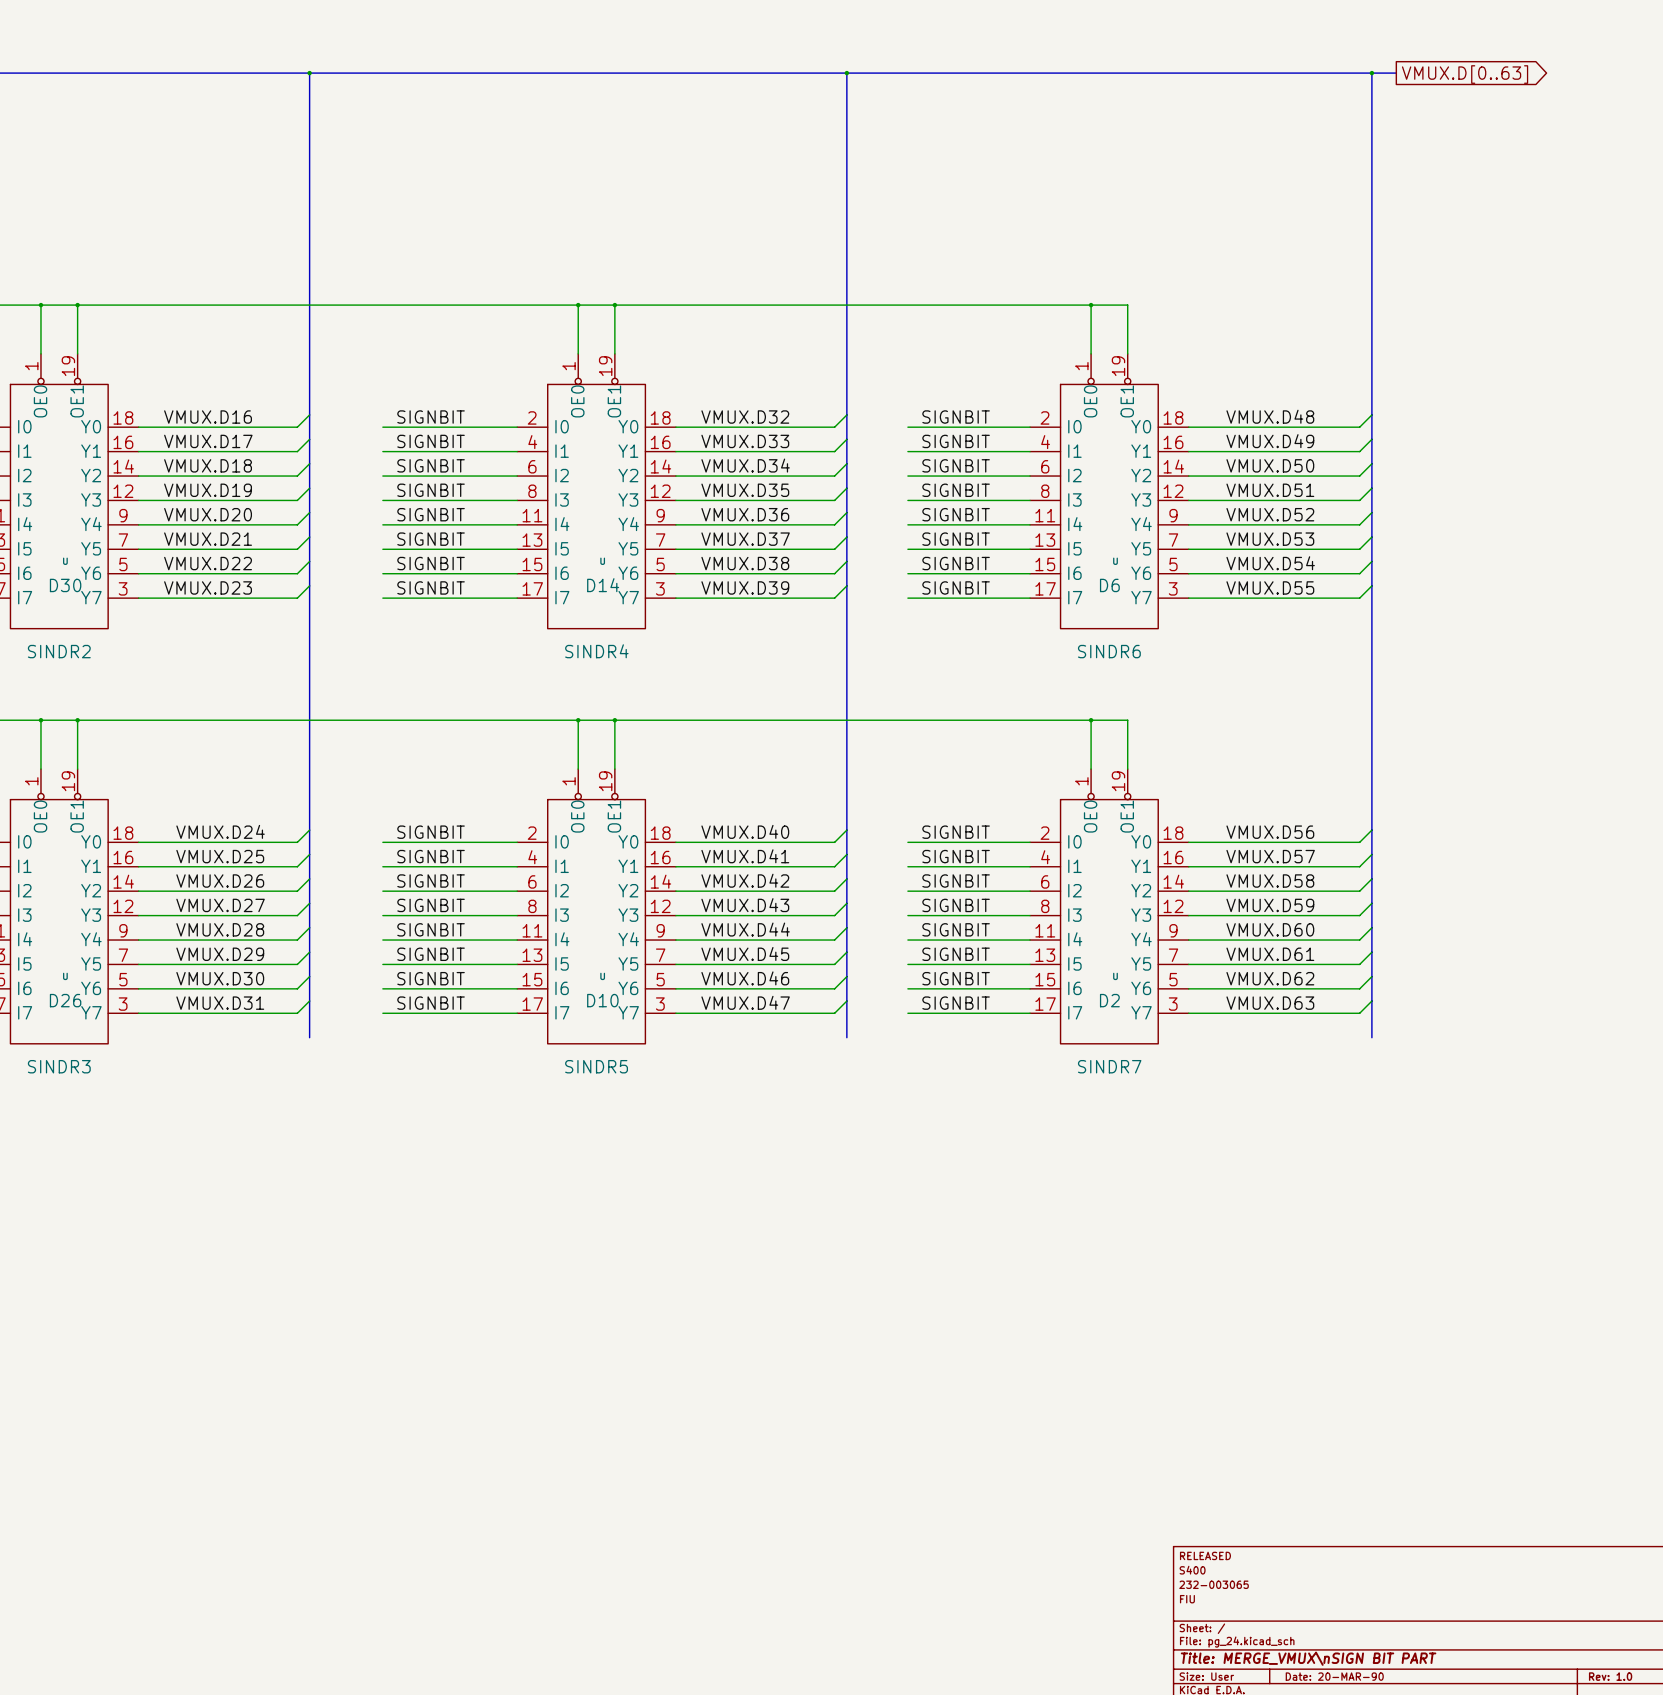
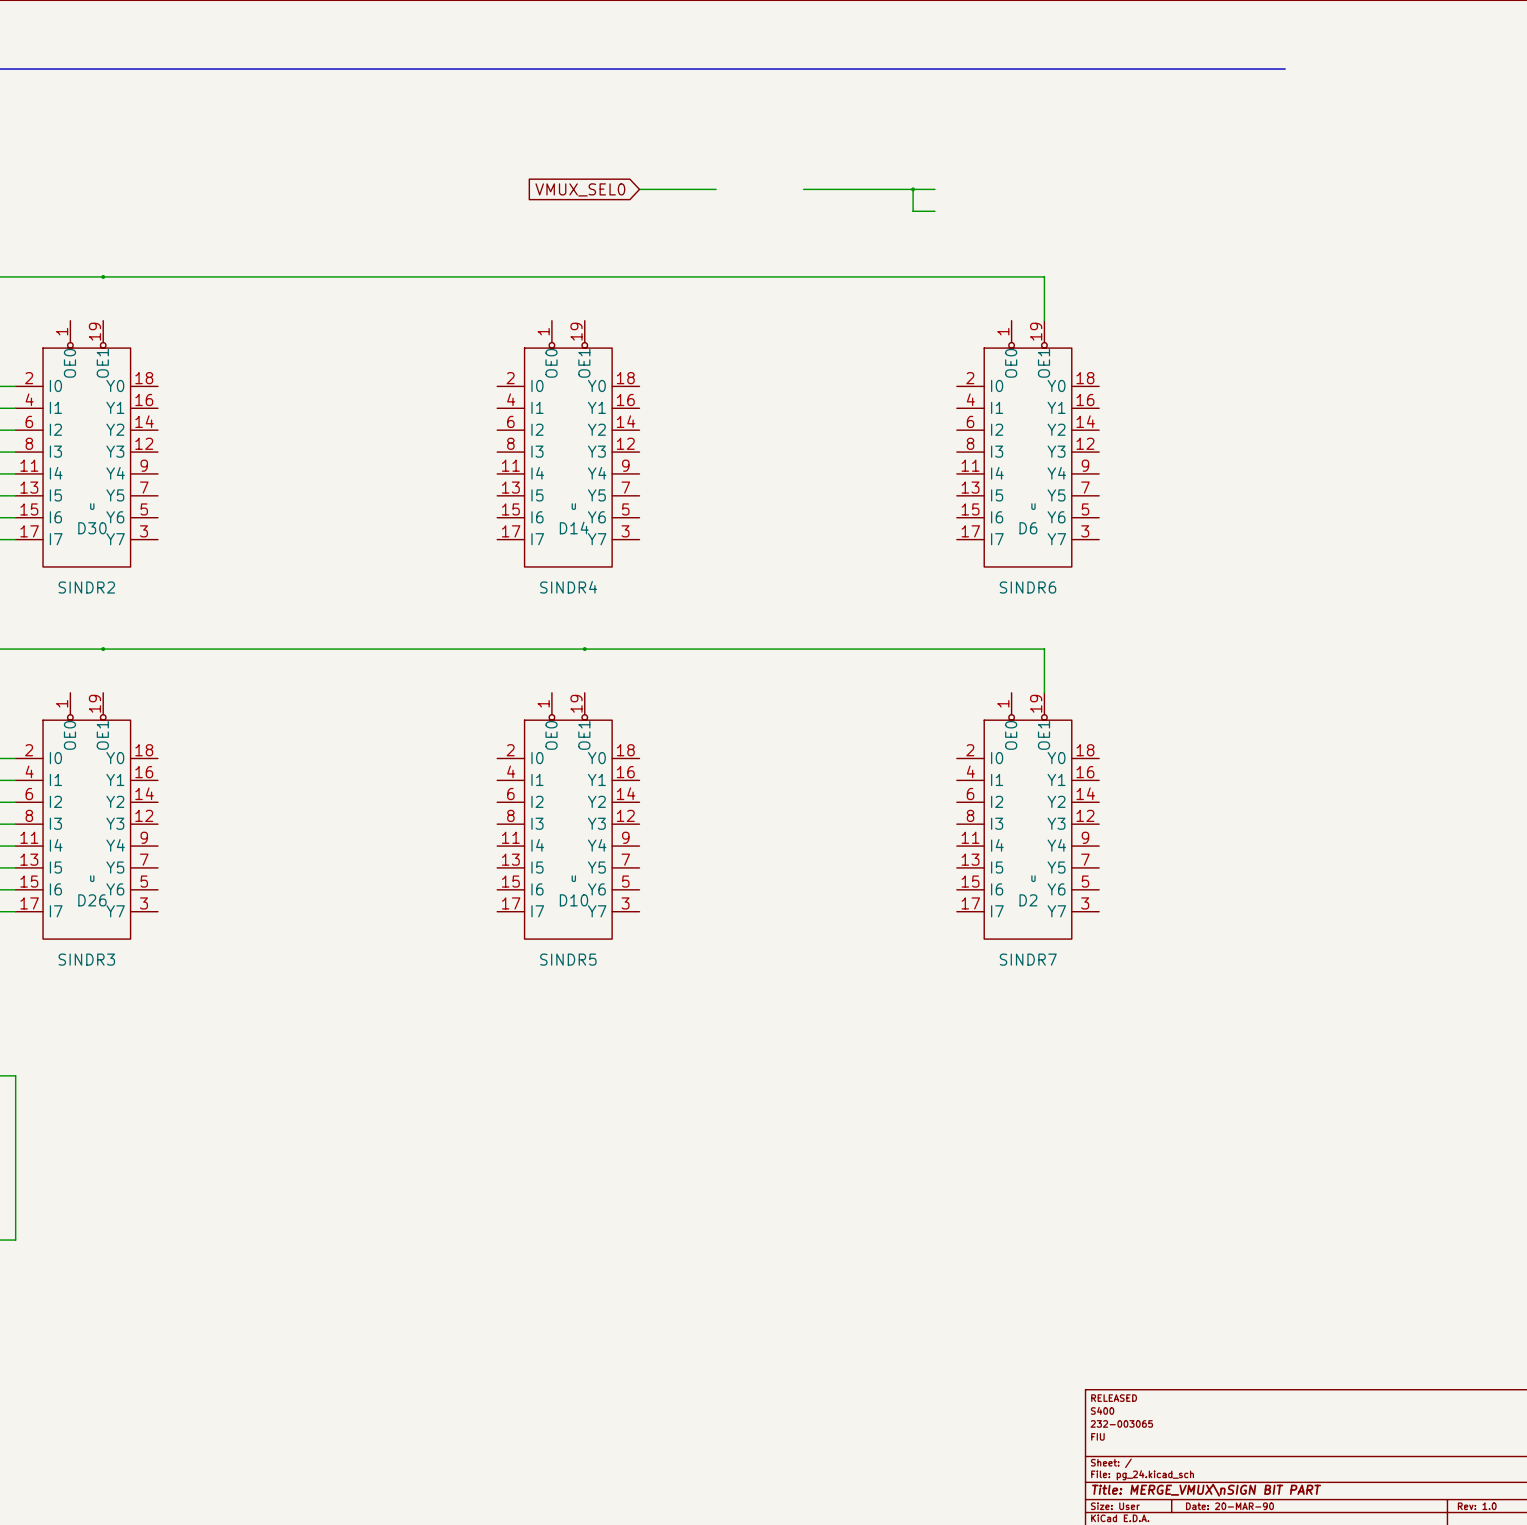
bus: (309, 73) (309, 1037) -> none
junction: (309, 73) -> none
bus: (846, 73) (846, 1037) -> none
junction: (846, 73) -> none
bus: (1371, 73) (1371, 1037) -> none
junction: (1371, 73) -> none
global label: VMUX.D[0..63] (1465, 74) -> none
global label: none -> VMUX_SEL0 (580, 189)
wire: none -> (639, 189) (716, 189)
wire: none -> (803, 189) (934, 189)
wire: none -> (913, 189) (913, 211) (934, 211)
junction: none -> (913, 189)
wire: (40, 305) (40, 353) -> none
junction: (40, 305) -> none
wire: (77, 305) (77, 353) -> none
wire: (578, 305) (578, 353) -> none
junction: (578, 305) -> none
wire: (614, 305) (614, 353) -> none
junction: (614, 305) -> none
wire: (1091, 305) (1091, 353) -> none
junction: (1091, 305) -> none
wire: (309, 414) (297, 427) (138, 427) -> none
wire: (846, 414) (834, 427) (675, 427) -> none
wire: (1371, 414) (1359, 427) (1188, 427) -> none
label: VMUX.D48 (1270, 416) -> none
label: VMUX.D16 (208, 417) -> none
label: SIGNBIT (431, 417) -> none
label: VMUX.D32 (745, 417) -> none
label: SIGNBIT (956, 417) -> none
wire: (382, 427) (517, 427) -> none
wire: (907, 427) (1030, 427) -> none
wire: (309, 439) (297, 451) (138, 451) -> none
wire: (846, 439) (834, 451) (675, 451) -> none
wire: (1371, 439) (1359, 451) (1188, 451) -> none
label: VMUX.D17 (208, 441) -> none
label: SIGNBIT (431, 441) -> none
label: VMUX.D33 (745, 441) -> none
label: SIGNBIT (956, 441) -> none
label: VMUX.D49 (1270, 441) -> none
wire: (382, 451) (517, 451) -> none
wire: (907, 451) (1030, 451) -> none
wire: (309, 463) (297, 476) (138, 476) -> none
wire: (846, 463) (834, 476) (675, 476) -> none
wire: (1371, 463) (1359, 476) (1188, 476) -> none
label: VMUX.D18 (208, 465) -> none
label: SIGNBIT (431, 465) -> none
label: VMUX.D34 (745, 465) -> none
label: SIGNBIT (956, 465) -> none
label: VMUX.D50 (1270, 465) -> none
wire: (382, 476) (517, 476) -> none
wire: (907, 476) (1030, 476) -> none
wire: (309, 488) (297, 500) (138, 500) -> none
wire: (846, 488) (834, 500) (675, 500) -> none
wire: (1371, 488) (1359, 500) (1188, 500) -> none
label: VMUX.D19 (208, 490) -> none
label: SIGNBIT (431, 490) -> none
label: VMUX.D35 (745, 490) -> none
label: SIGNBIT (956, 490) -> none
label: VMUX.D51 (1270, 490) -> none
wire: (382, 500) (517, 500) -> none
wire: (907, 500) (1030, 500) -> none
wire: (309, 512) (297, 524) (138, 524) -> none
wire: (846, 512) (834, 524) (675, 524) -> none
wire: (1371, 512) (1359, 524) (1188, 524) -> none
label: VMUX.D20 (208, 514) -> none
label: SIGNBIT (431, 514) -> none
label: VMUX.D36 (745, 514) -> none
label: SIGNBIT (956, 514) -> none
label: VMUX.D52 (1270, 514) -> none
wire: (382, 524) (517, 524) -> none
wire: (907, 524) (1030, 524) -> none
wire: (309, 537) (297, 549) (138, 549) -> none
wire: (846, 537) (834, 549) (675, 549) -> none
wire: (1371, 537) (1359, 549) (1188, 549) -> none
label: VMUX.D21 (208, 539) -> none
label: SIGNBIT (431, 539) -> none
label: VMUX.D37 (745, 539) -> none
label: SIGNBIT (956, 539) -> none
label: VMUX.D53 (1270, 539) -> none
wire: (382, 549) (517, 549) -> none
wire: (907, 549) (1030, 549) -> none
wire: (309, 561) (297, 573) (138, 573) -> none
wire: (846, 561) (834, 573) (675, 573) -> none
wire: (1371, 561) (1359, 573) (1188, 573) -> none
label: VMUX.D22 (208, 563) -> none
label: SIGNBIT (431, 563) -> none
label: VMUX.D38 (745, 563) -> none
label: SIGNBIT (956, 563) -> none
label: VMUX.D54 (1270, 563) -> none
wire: (382, 573) (517, 573) -> none
wire: (907, 573) (1030, 573) -> none
wire: (309, 585) (297, 598) (138, 598) -> none
wire: (846, 585) (834, 598) (675, 598) -> none
wire: (1371, 585) (1359, 598) (1188, 598) -> none
label: VMUX.D23 (208, 587) -> none
label: SIGNBIT (431, 587) -> none
label: VMUX.D39 (745, 587) -> none
label: SIGNBIT (956, 587) -> none
label: VMUX.D55 (1270, 587) -> none
wire: (382, 598) (517, 598) -> none
wire: (907, 598) (1030, 598) -> none
wire: (40, 720) (40, 769) -> none
junction: (40, 720) -> none
wire: (77, 720) (77, 769) -> none
wire: (578, 720) (578, 769) -> none
junction: (578, 720) -> none
wire: (614, 720) (614, 769) -> none
wire: (1091, 720) (1091, 769) -> none
junction: (1091, 720) -> none
wire: (309, 830) (297, 842) (138, 842) -> none
wire: (846, 830) (834, 842) (675, 842) -> none
wire: (1371, 830) (1359, 842) (1188, 842) -> none
label: VMUX.D24 (220, 831) -> none
label: VMUX.D40 (745, 831) -> none
label: SIGNBIT (431, 832) -> none
label: SIGNBIT (956, 832) -> none
label: VMUX.D56 (1270, 832) -> none
wire: (382, 842) (517, 842) -> none
wire: (907, 842) (1030, 842) -> none
wire: (309, 854) (297, 866) (138, 866) -> none
wire: (846, 854) (834, 866) (675, 866) -> none
wire: (1371, 854) (1359, 866) (1188, 866) -> none
label: VMUX.D25 (220, 856) -> none
label: SIGNBIT (431, 856) -> none
label: VMUX.D41 (745, 856) -> none
label: SIGNBIT (956, 856) -> none
label: VMUX.D57 (1270, 856) -> none
wire: (382, 866) (517, 866) -> none
wire: (907, 866) (1030, 866) -> none
wire: (309, 878) (297, 891) (138, 891) -> none
wire: (846, 878) (834, 891) (675, 891) -> none
wire: (1371, 878) (1359, 891) (1188, 891) -> none
label: VMUX.D42 (745, 880) -> none
label: VMUX.D26 (220, 881) -> none
label: SIGNBIT (431, 881) -> none
label: SIGNBIT (956, 881) -> none
label: VMUX.D58 (1270, 881) -> none
wire: (382, 891) (517, 891) -> none
wire: (907, 891) (1030, 891) -> none
wire: (309, 903) (297, 915) (138, 915) -> none
wire: (846, 903) (834, 915) (675, 915) -> none
wire: (1371, 903) (1359, 915) (1188, 915) -> none
label: VMUX.D27 (220, 905) -> none
label: SIGNBIT (431, 905) -> none
label: VMUX.D43 (745, 905) -> none
label: SIGNBIT (956, 905) -> none
label: VMUX.D59 (1270, 905) -> none
wire: (382, 915) (517, 915) -> none
wire: (907, 915) (1030, 915) -> none
wire: (309, 927) (297, 940) (138, 940) -> none
wire: (846, 927) (834, 940) (675, 940) -> none
wire: (1371, 927) (1359, 940) (1188, 940) -> none
label: VMUX.D28 (220, 929) -> none
label: SIGNBIT (431, 929) -> none
label: VMUX.D44 (745, 929) -> none
label: SIGNBIT (956, 929) -> none
label: VMUX.D60 (1270, 929) -> none
wire: (382, 940) (517, 940) -> none
wire: (907, 940) (1030, 940) -> none
wire: (309, 952) (297, 964) (138, 964) -> none
wire: (846, 952) (834, 964) (675, 964) -> none
wire: (1371, 952) (1359, 964) (1188, 964) -> none
label: VMUX.D45 (745, 953) -> none
label: VMUX.D29 (220, 954) -> none
label: SIGNBIT (431, 954) -> none
label: SIGNBIT (956, 954) -> none
label: VMUX.D61 (1270, 954) -> none
wire: (382, 964) (517, 964) -> none
wire: (907, 964) (1030, 964) -> none
wire: (309, 976) (297, 988) (138, 988) -> none
wire: (846, 976) (834, 988) (675, 988) -> none
wire: (1371, 976) (1359, 988) (1188, 988) -> none
label: VMUX.D30 (220, 978) -> none
label: SIGNBIT (431, 978) -> none
label: VMUX.D46 (745, 978) -> none
label: SIGNBIT (956, 978) -> none
label: VMUX.D62 (1270, 978) -> none
wire: (382, 988) (517, 988) -> none
wire: (907, 988) (1030, 988) -> none
wire: (309, 1001) (297, 1013) (138, 1013) -> none
wire: (846, 1001) (834, 1013) (675, 1013) -> none
wire: (1371, 1001) (1359, 1013) (1188, 1013) -> none
label: VMUX.D47 (745, 1002) -> none
label: VMUX.D31 (220, 1003) -> none
label: SIGNBIT (431, 1003) -> none
label: SIGNBIT (956, 1003) -> none
label: VMUX.D63 (1270, 1003) -> none
wire: (382, 1013) (517, 1013) -> none
wire: (907, 1013) (1030, 1013) -> none

